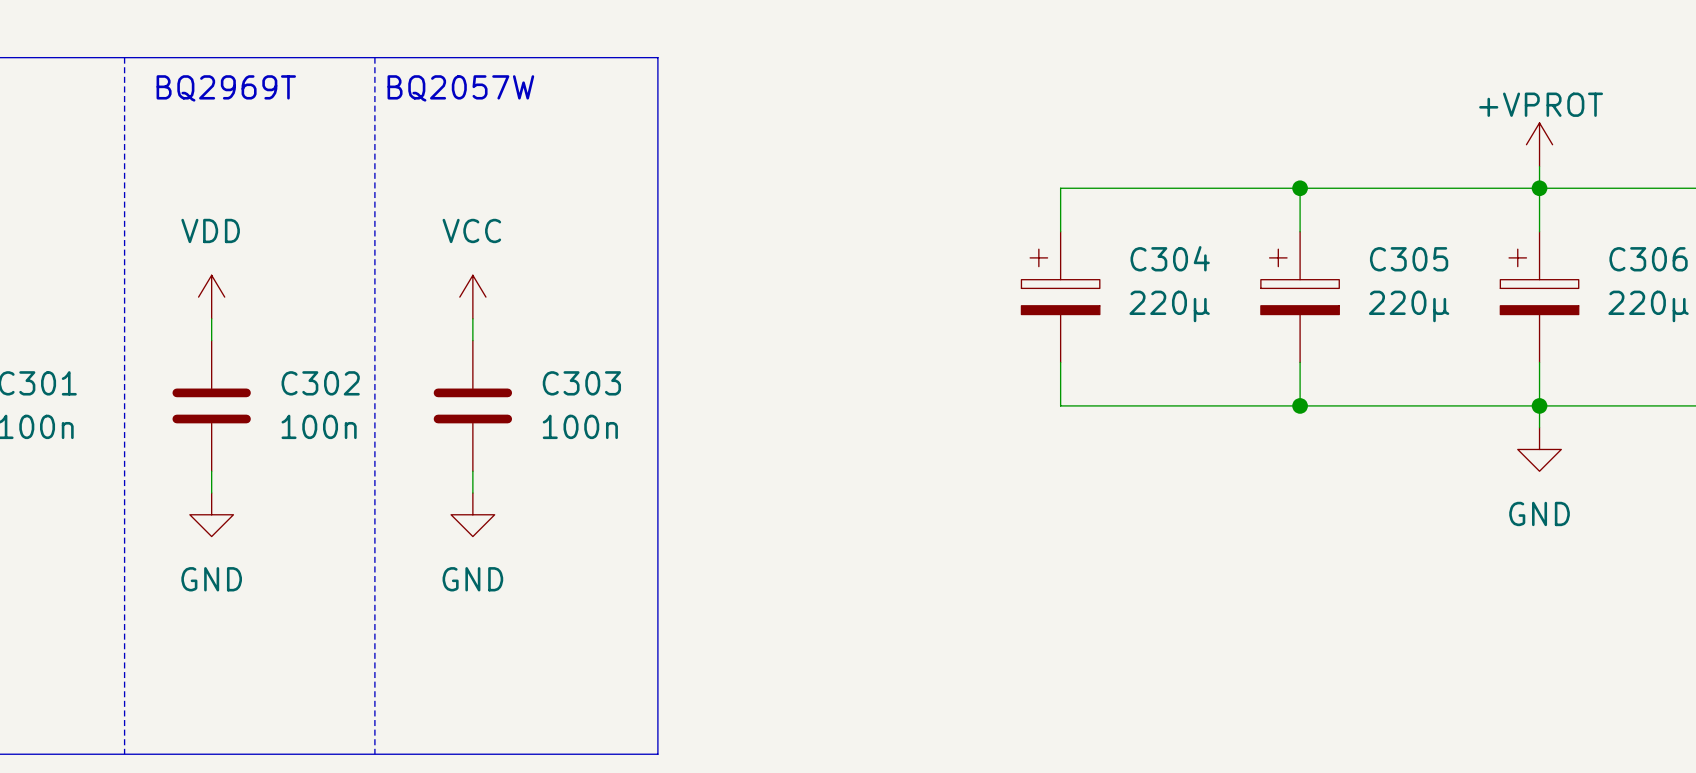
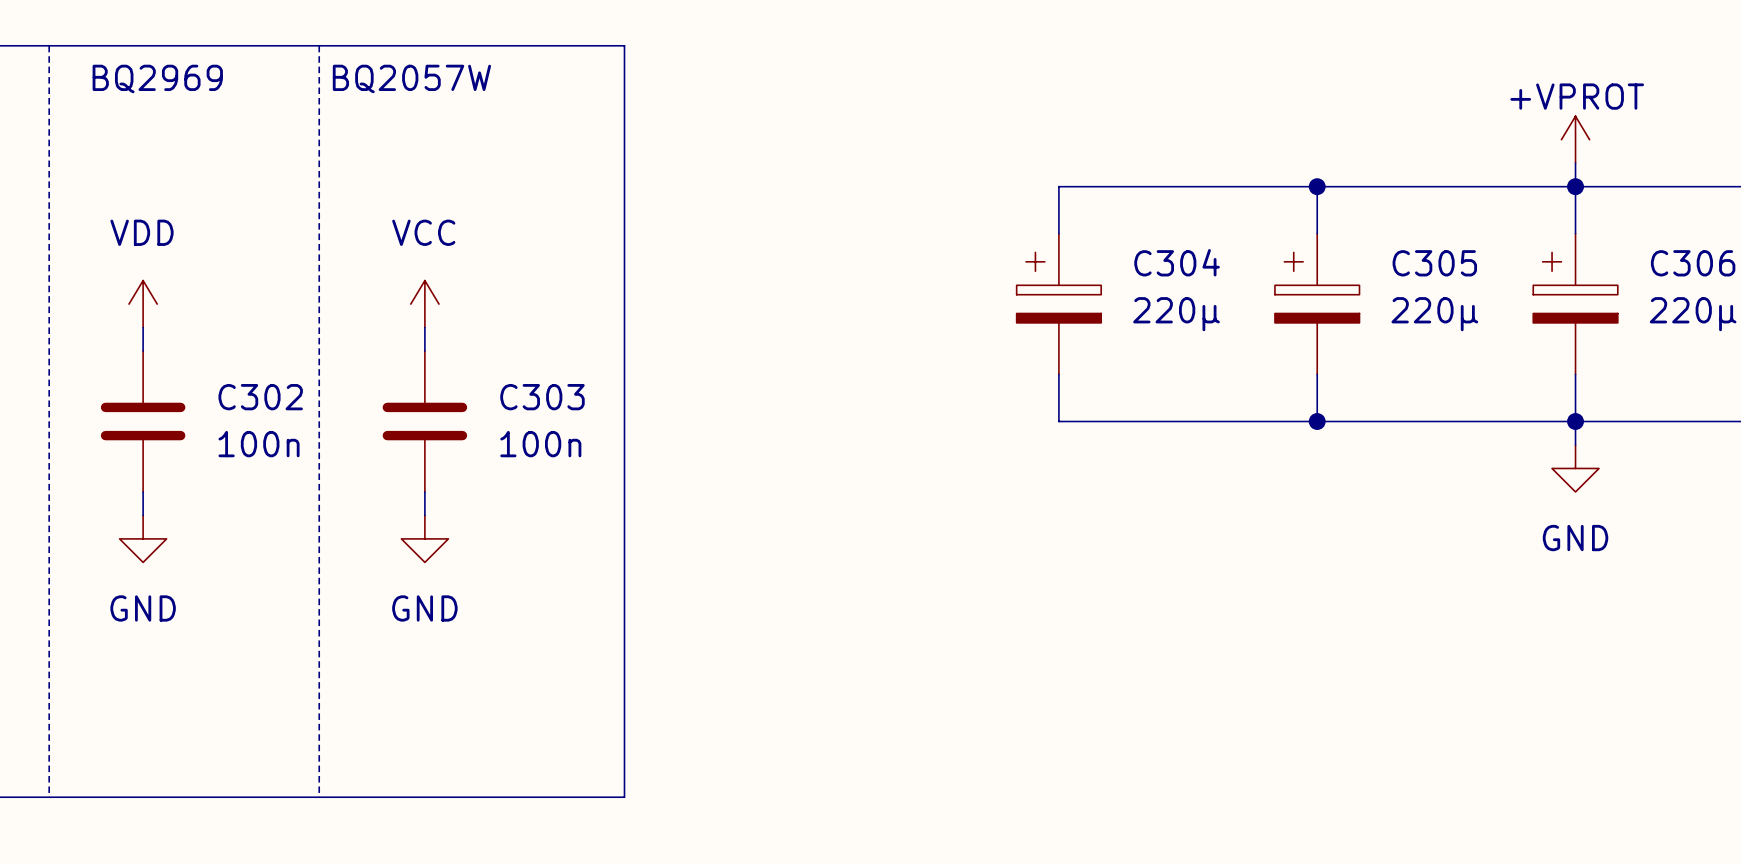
text: BQ2969T (226, 88) -> BQ2969 (157, 78)

